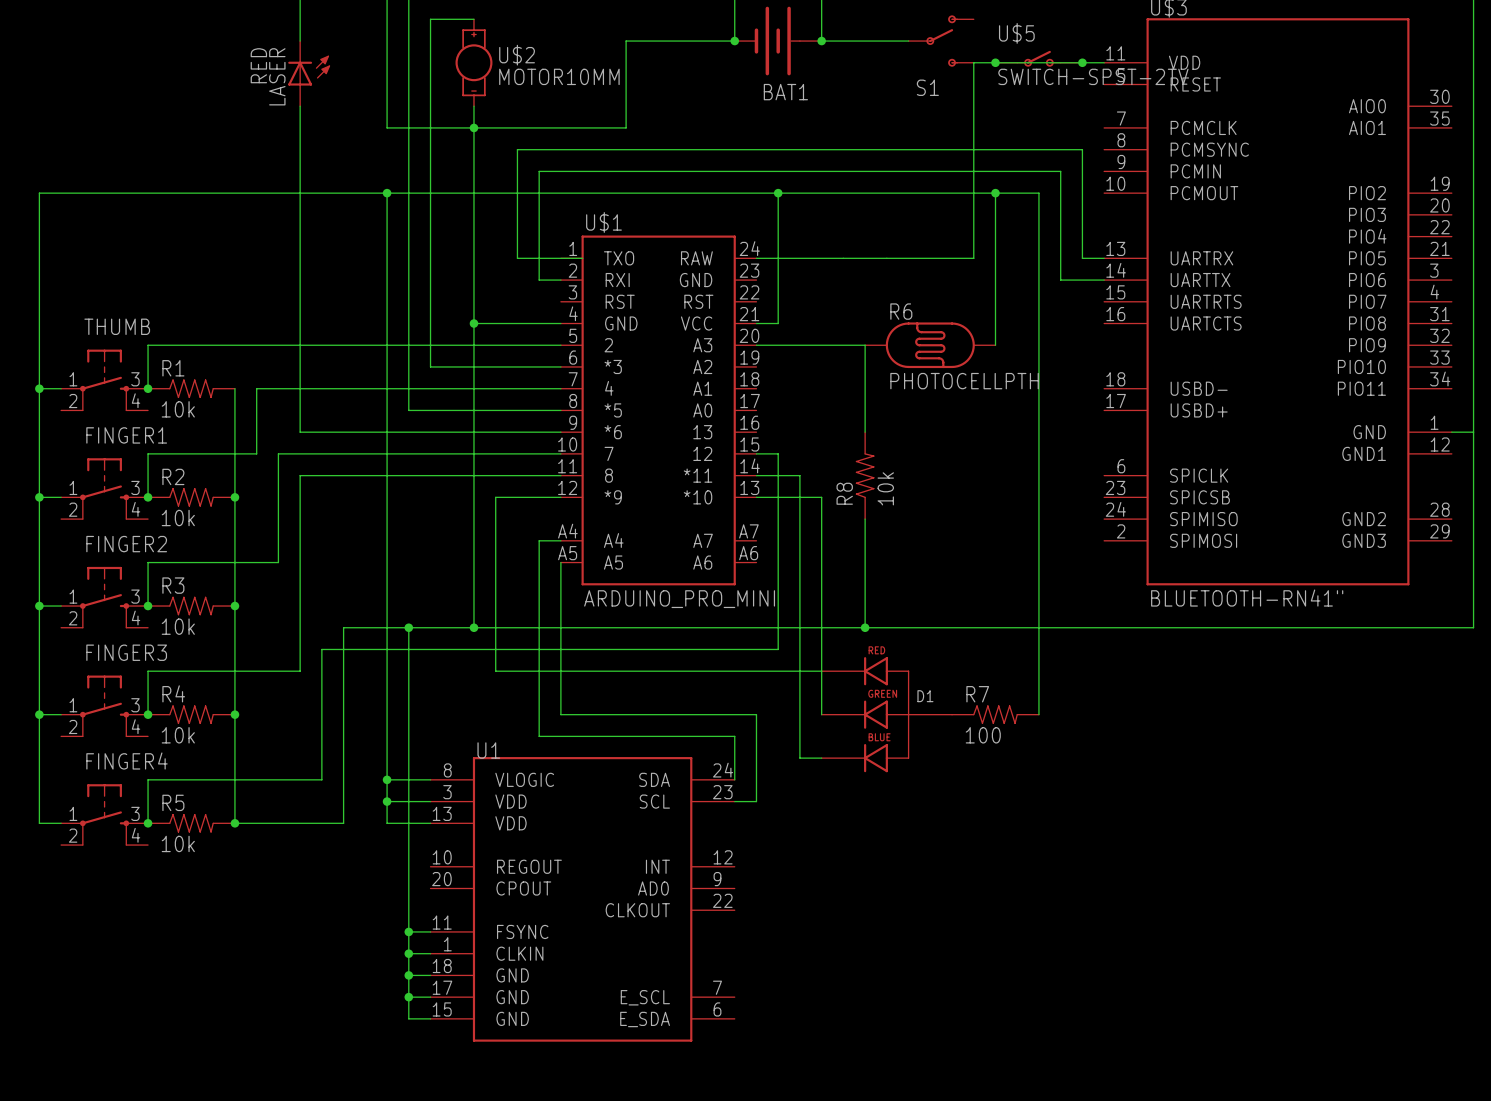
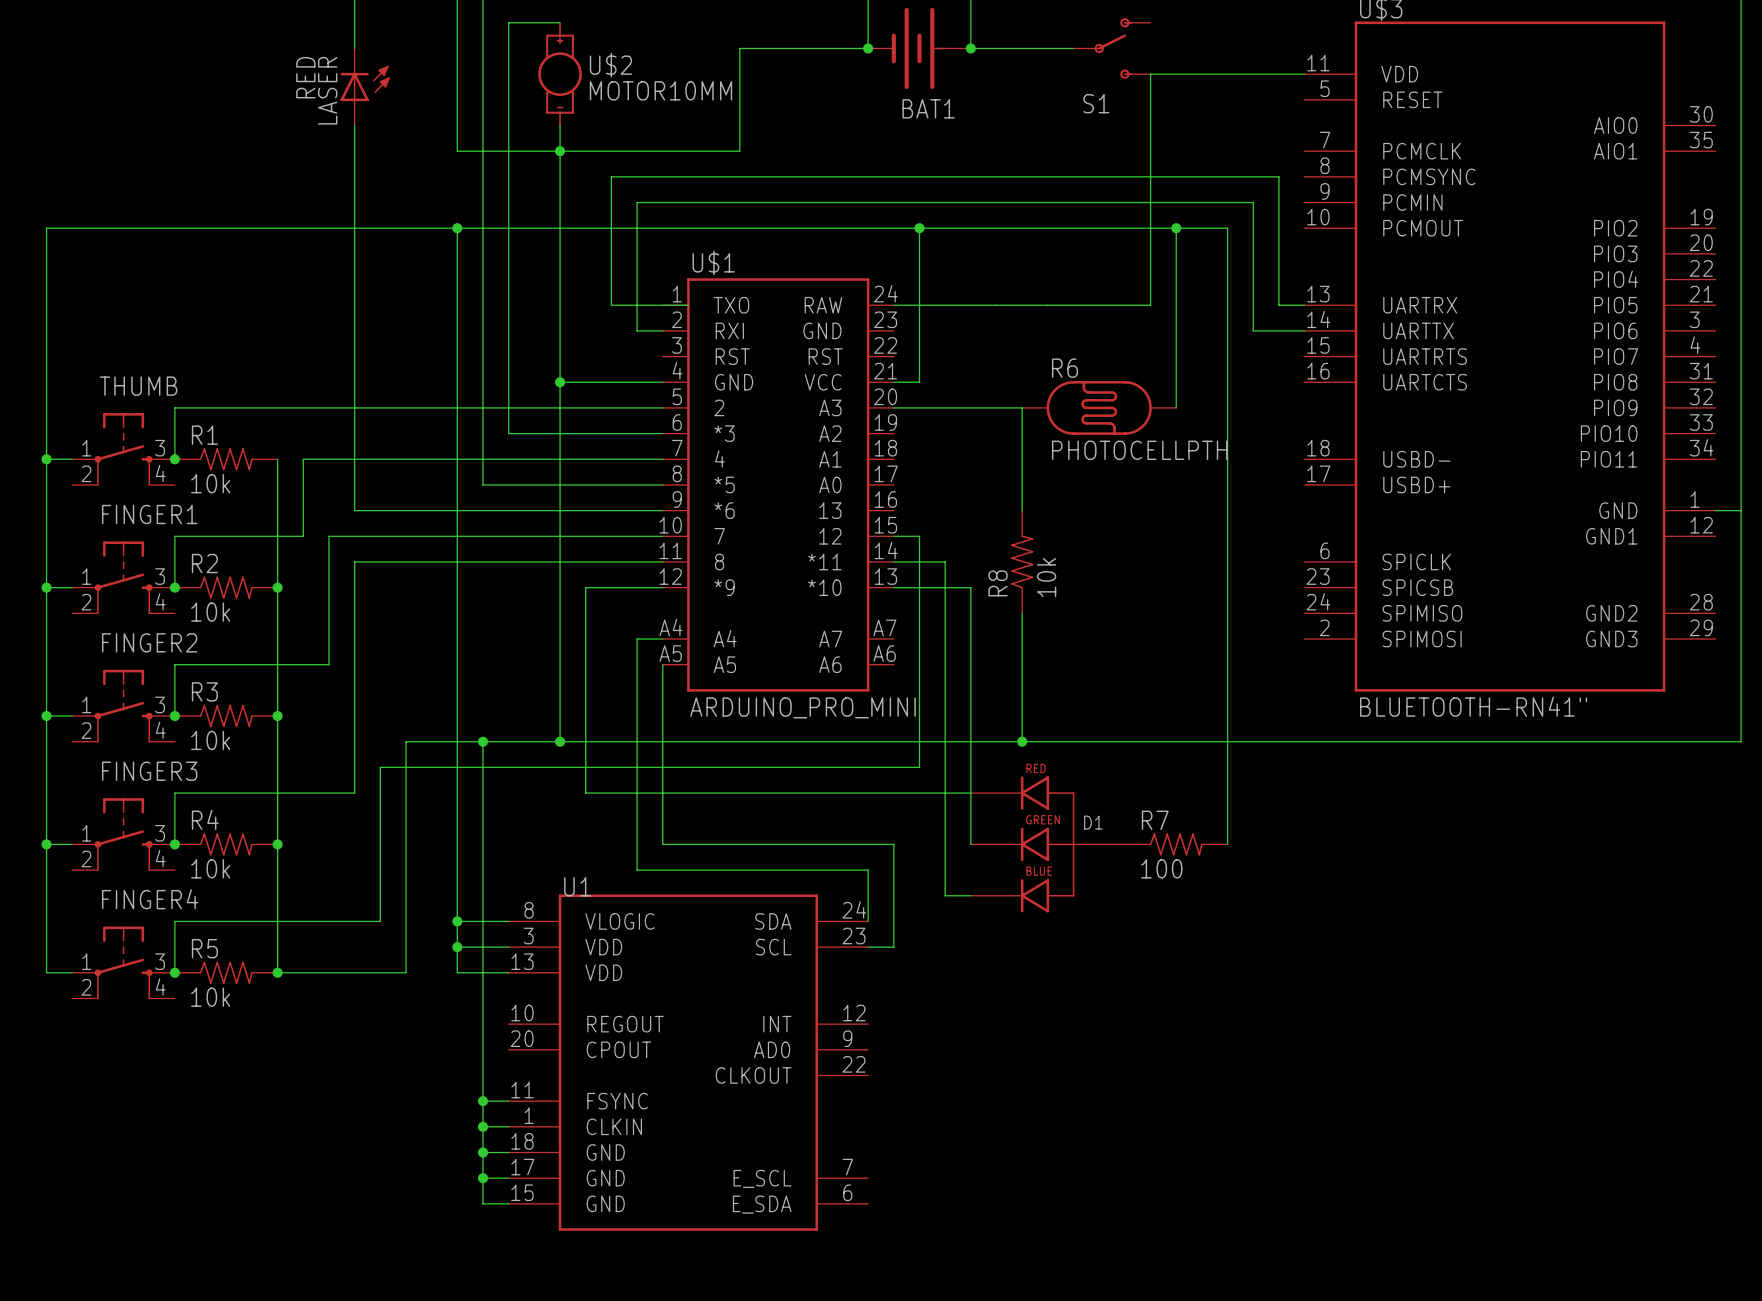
U$5: SWITCH-SPST-2TV (1038, 58) -> none
junction: (995, 62) -> none
junction: (1082, 62) -> none

